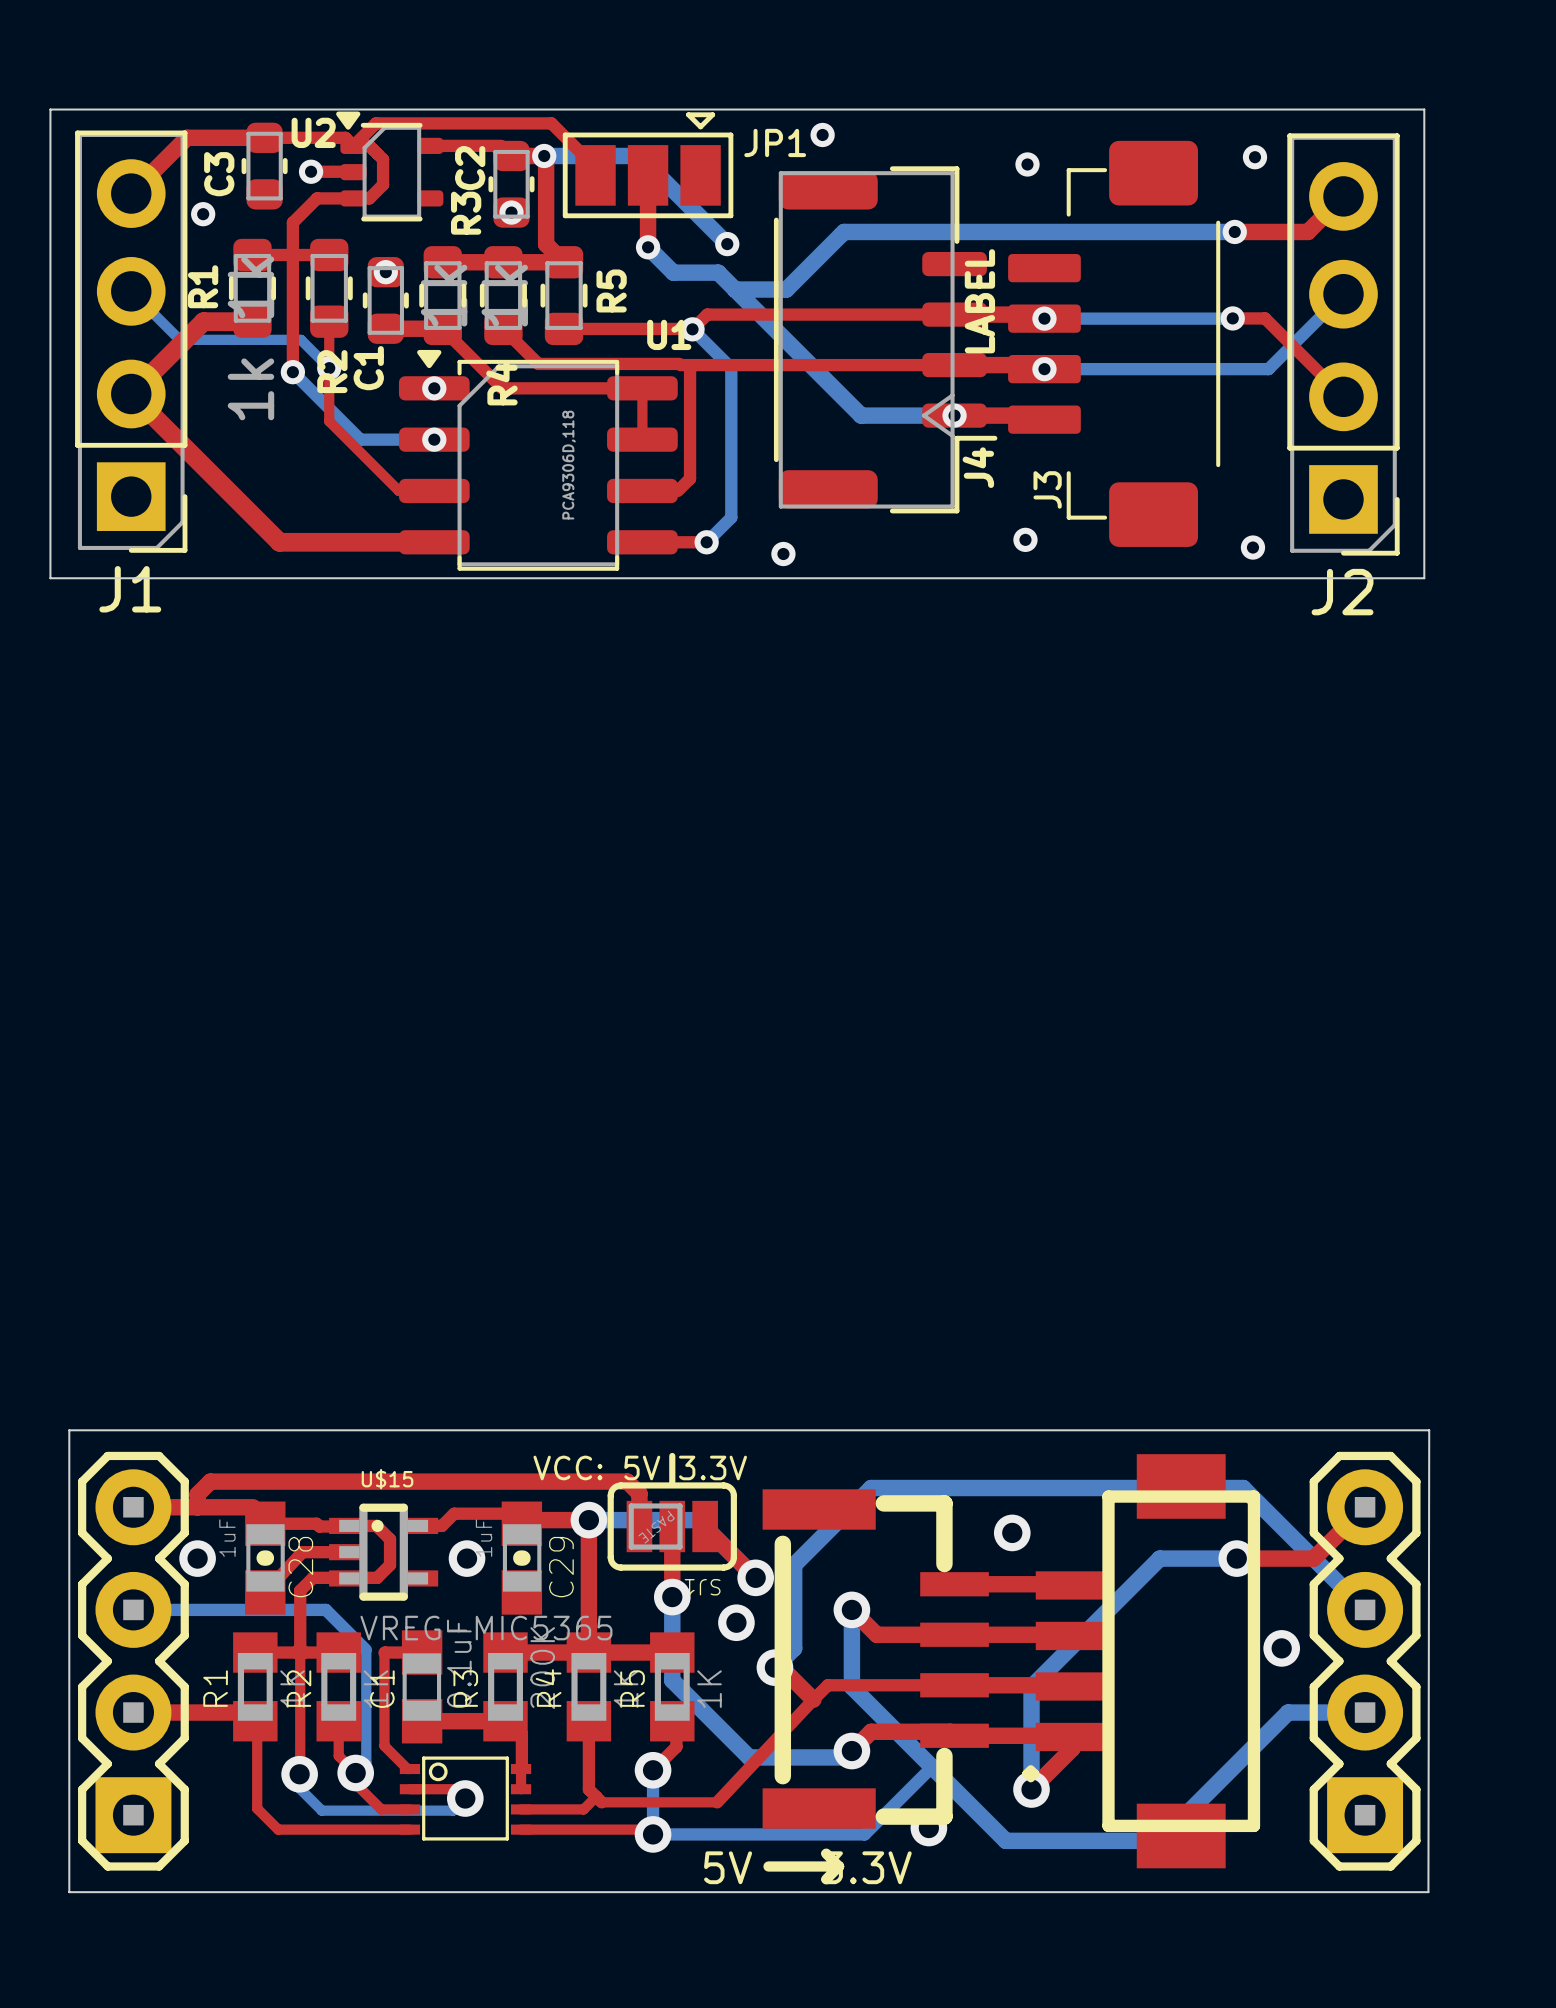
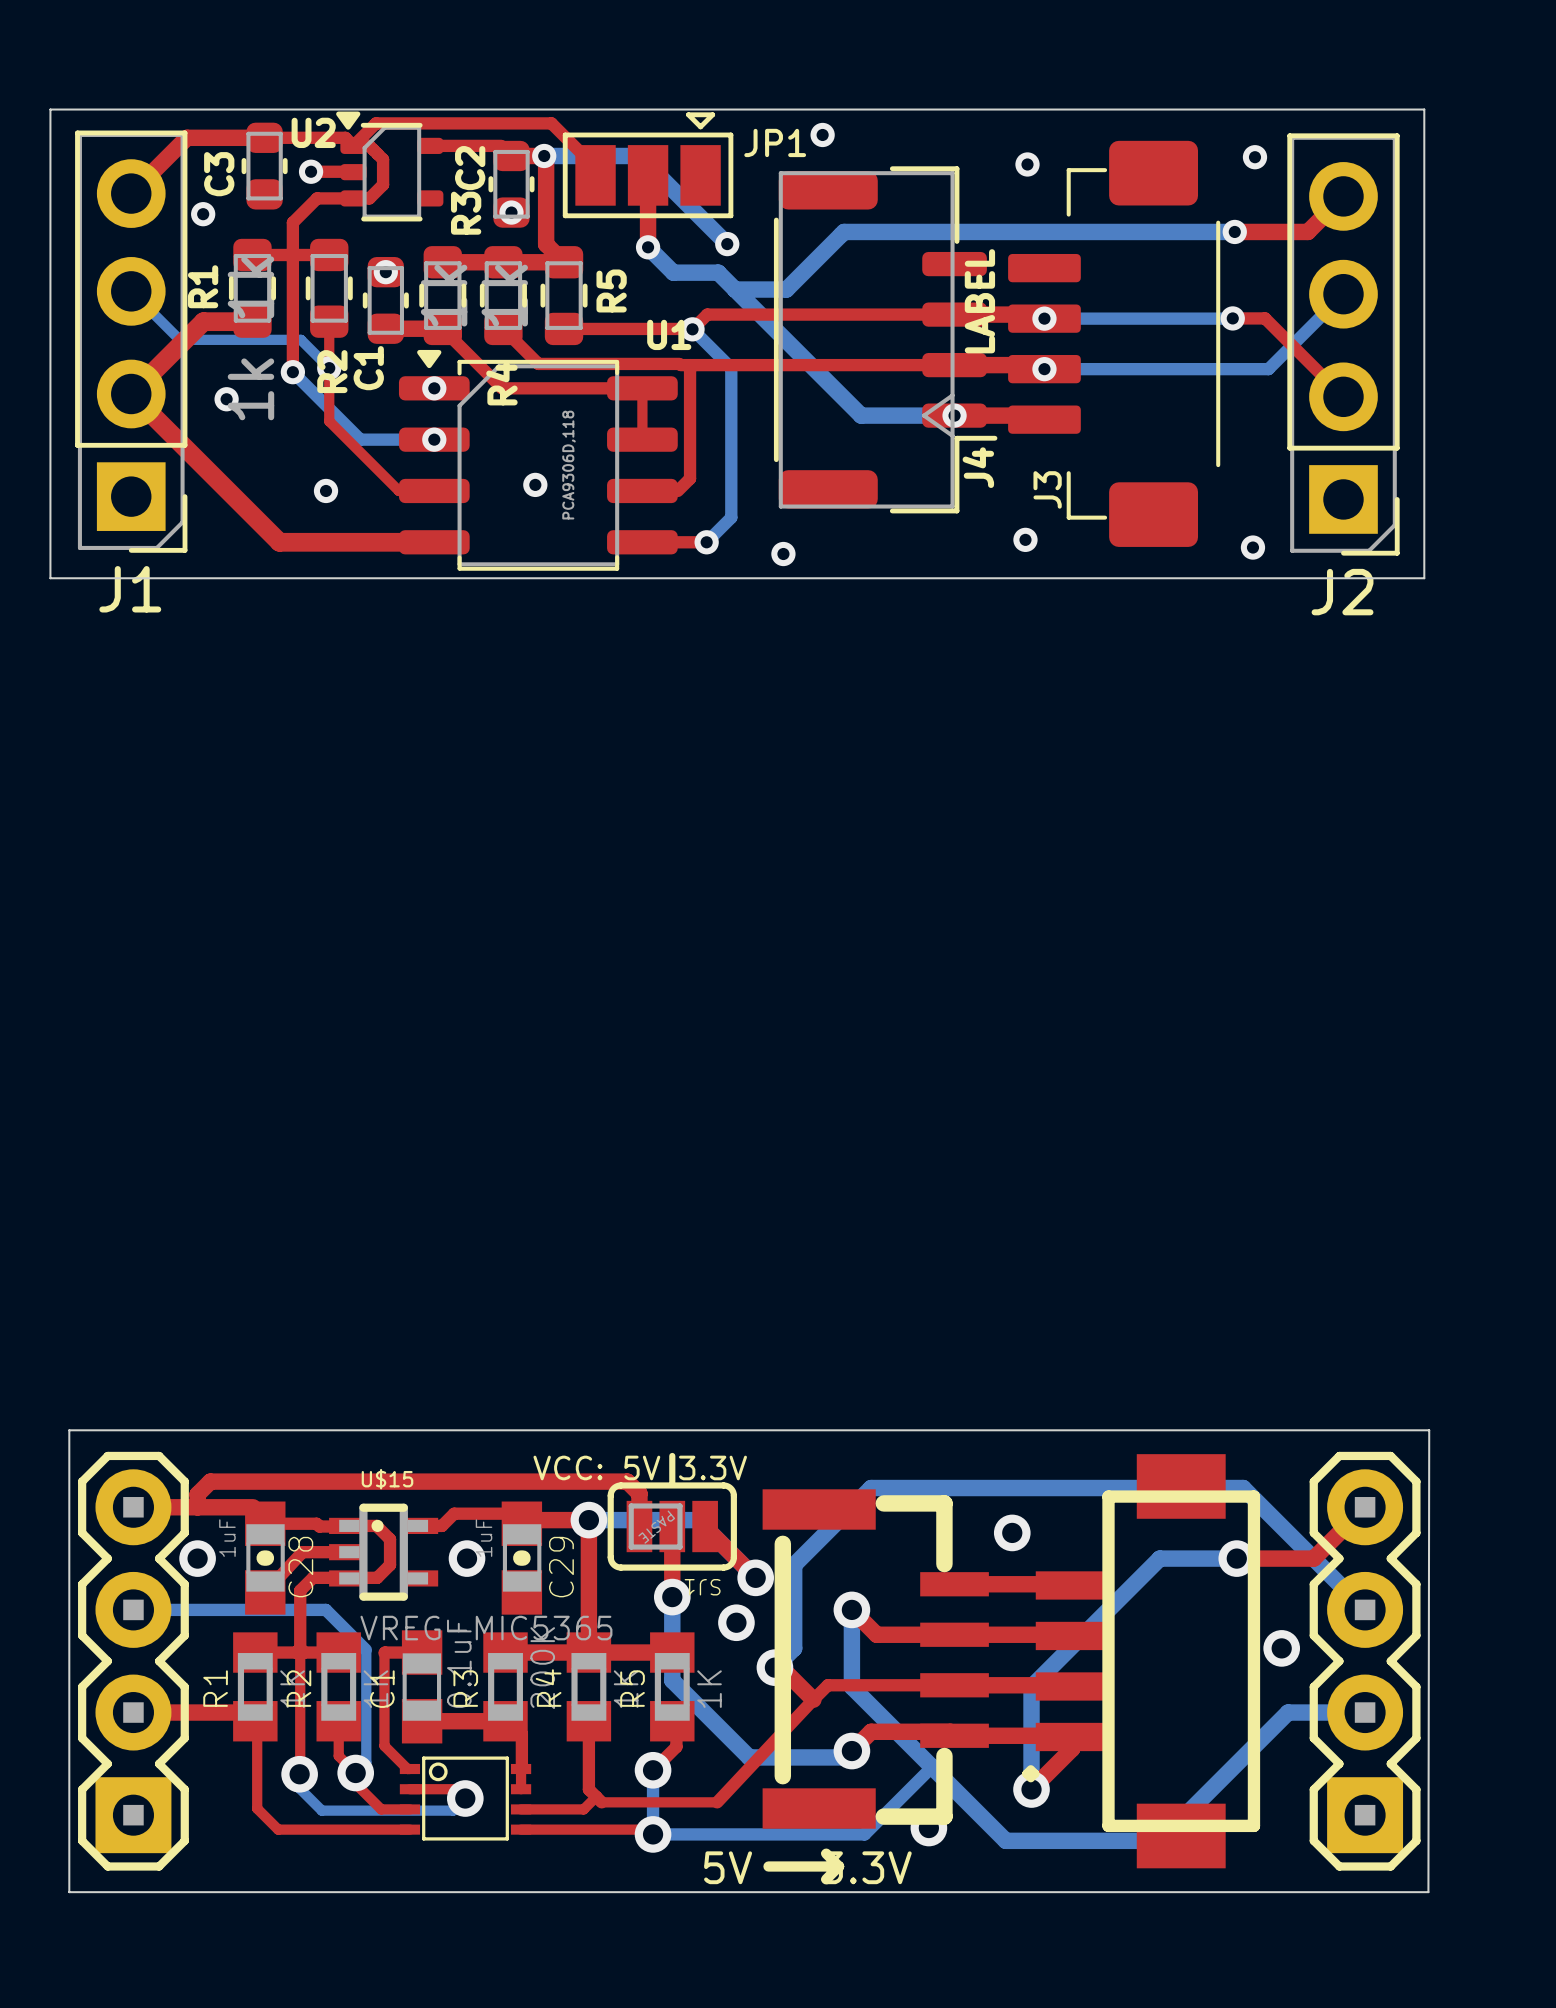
via: none -> (226, 399)
via: none -> (535, 484)
via: none -> (326, 490)

